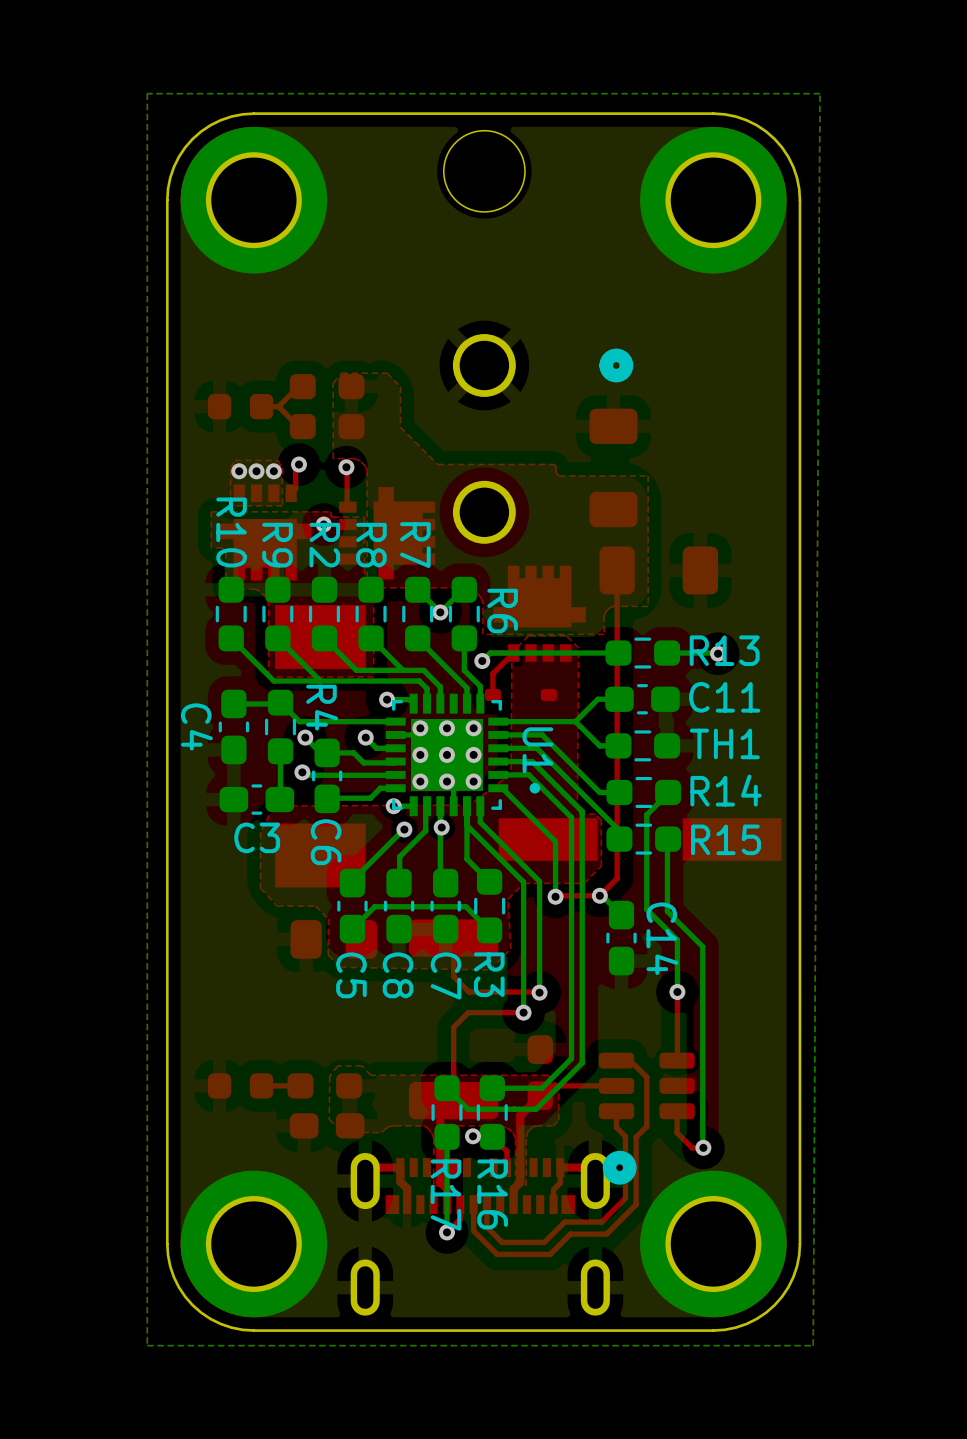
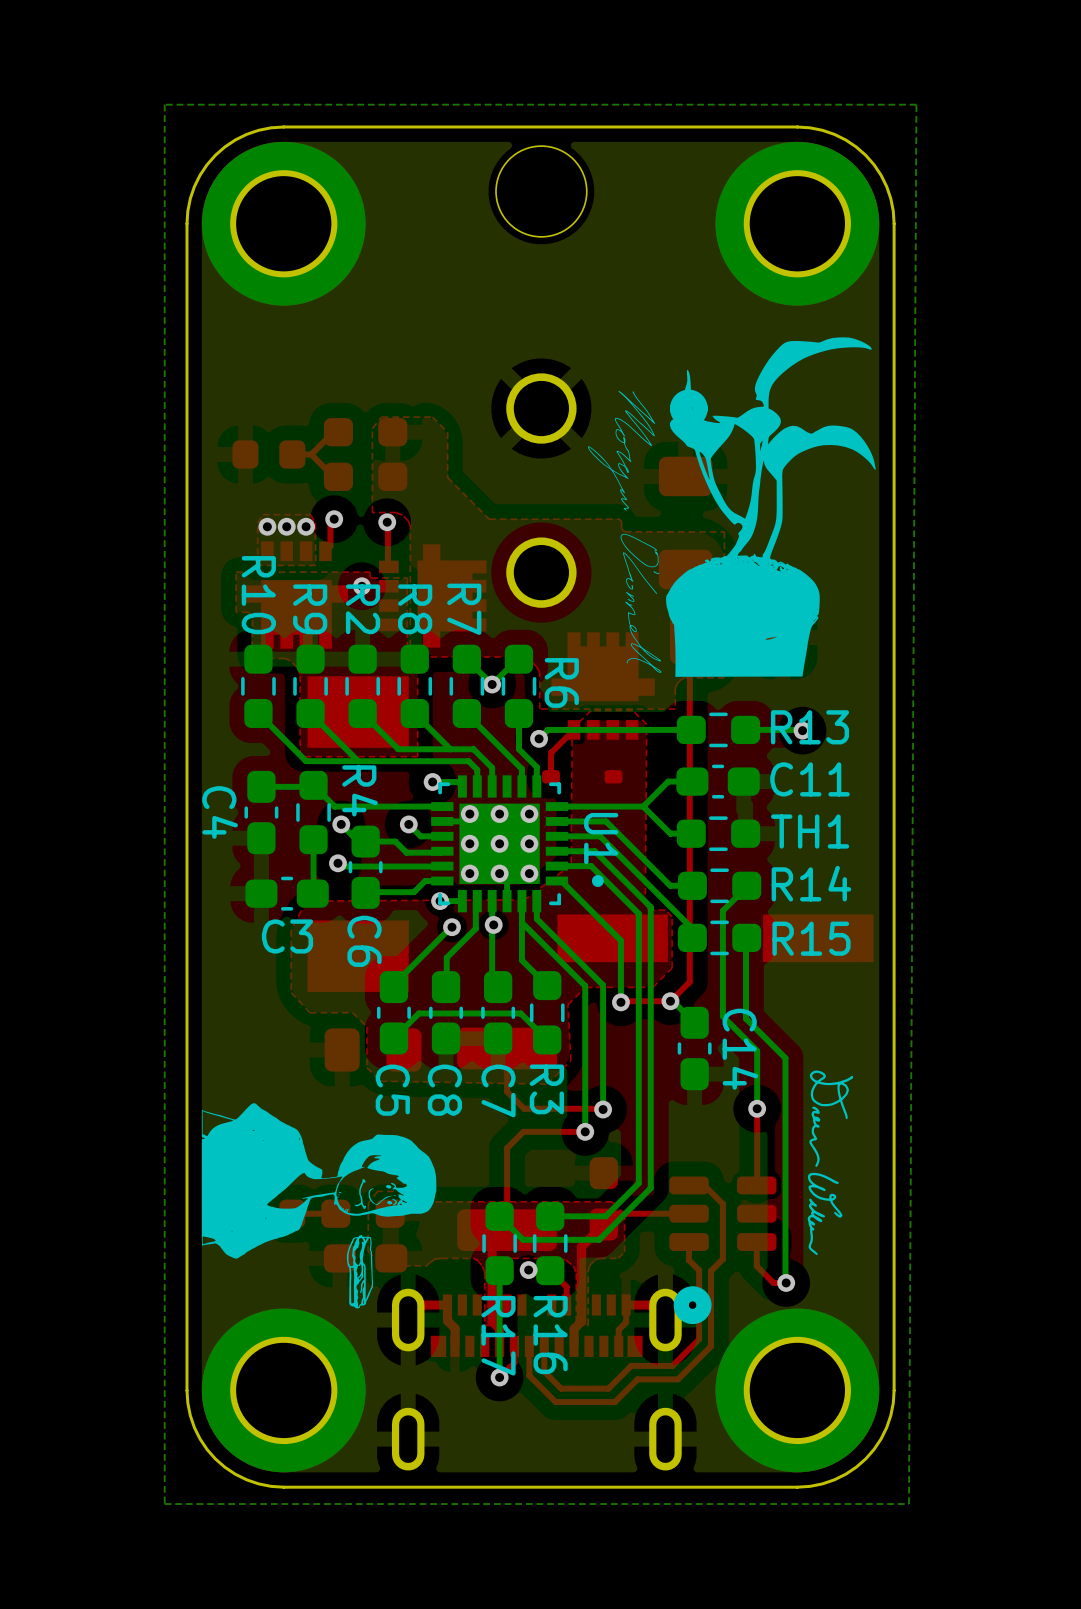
drawing: none -> [587, 337, 876, 677]
drawing: none -> [807, 1070, 854, 1256]
drawing: none -> [201, 1103, 437, 1309]

